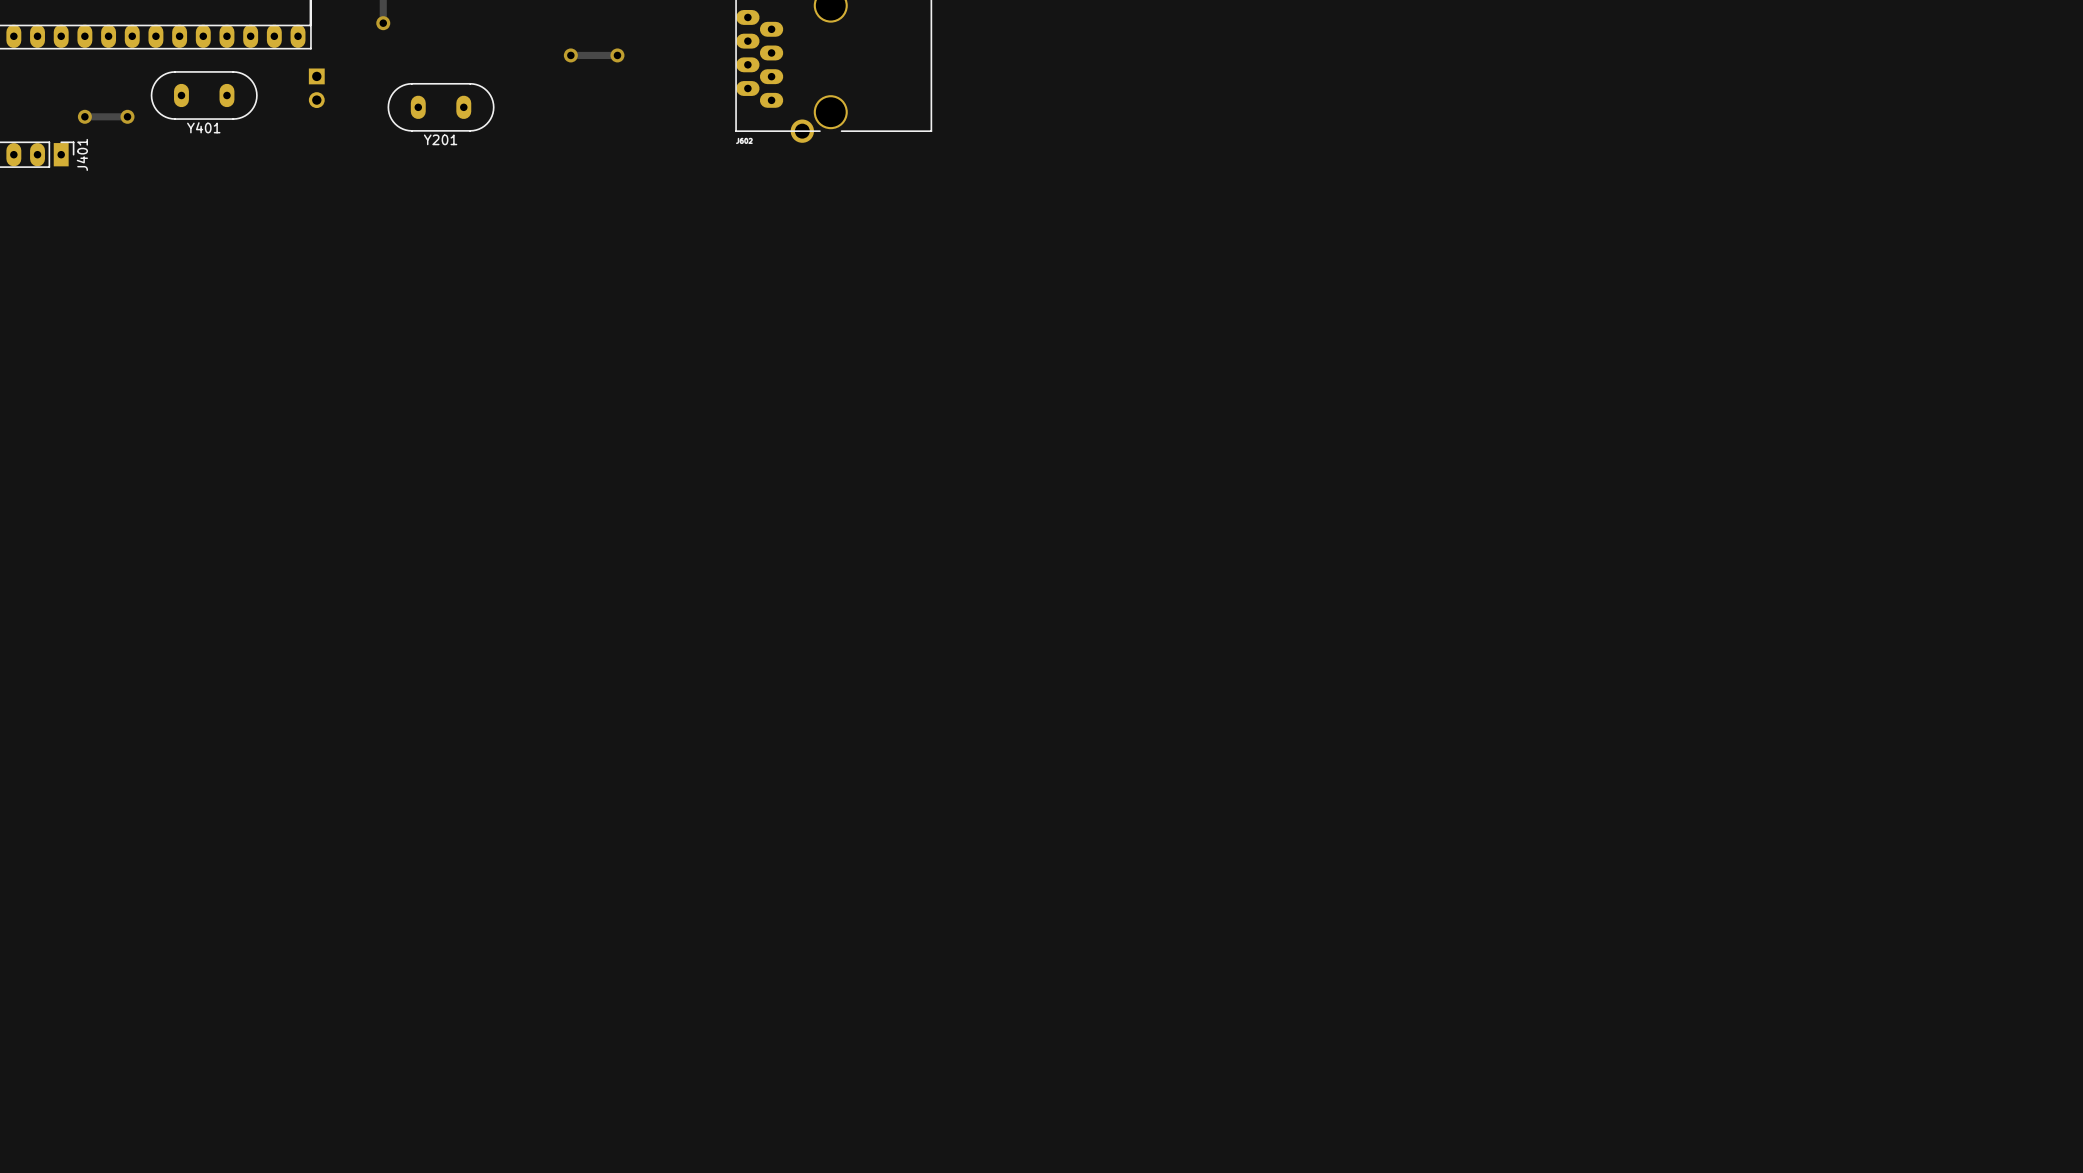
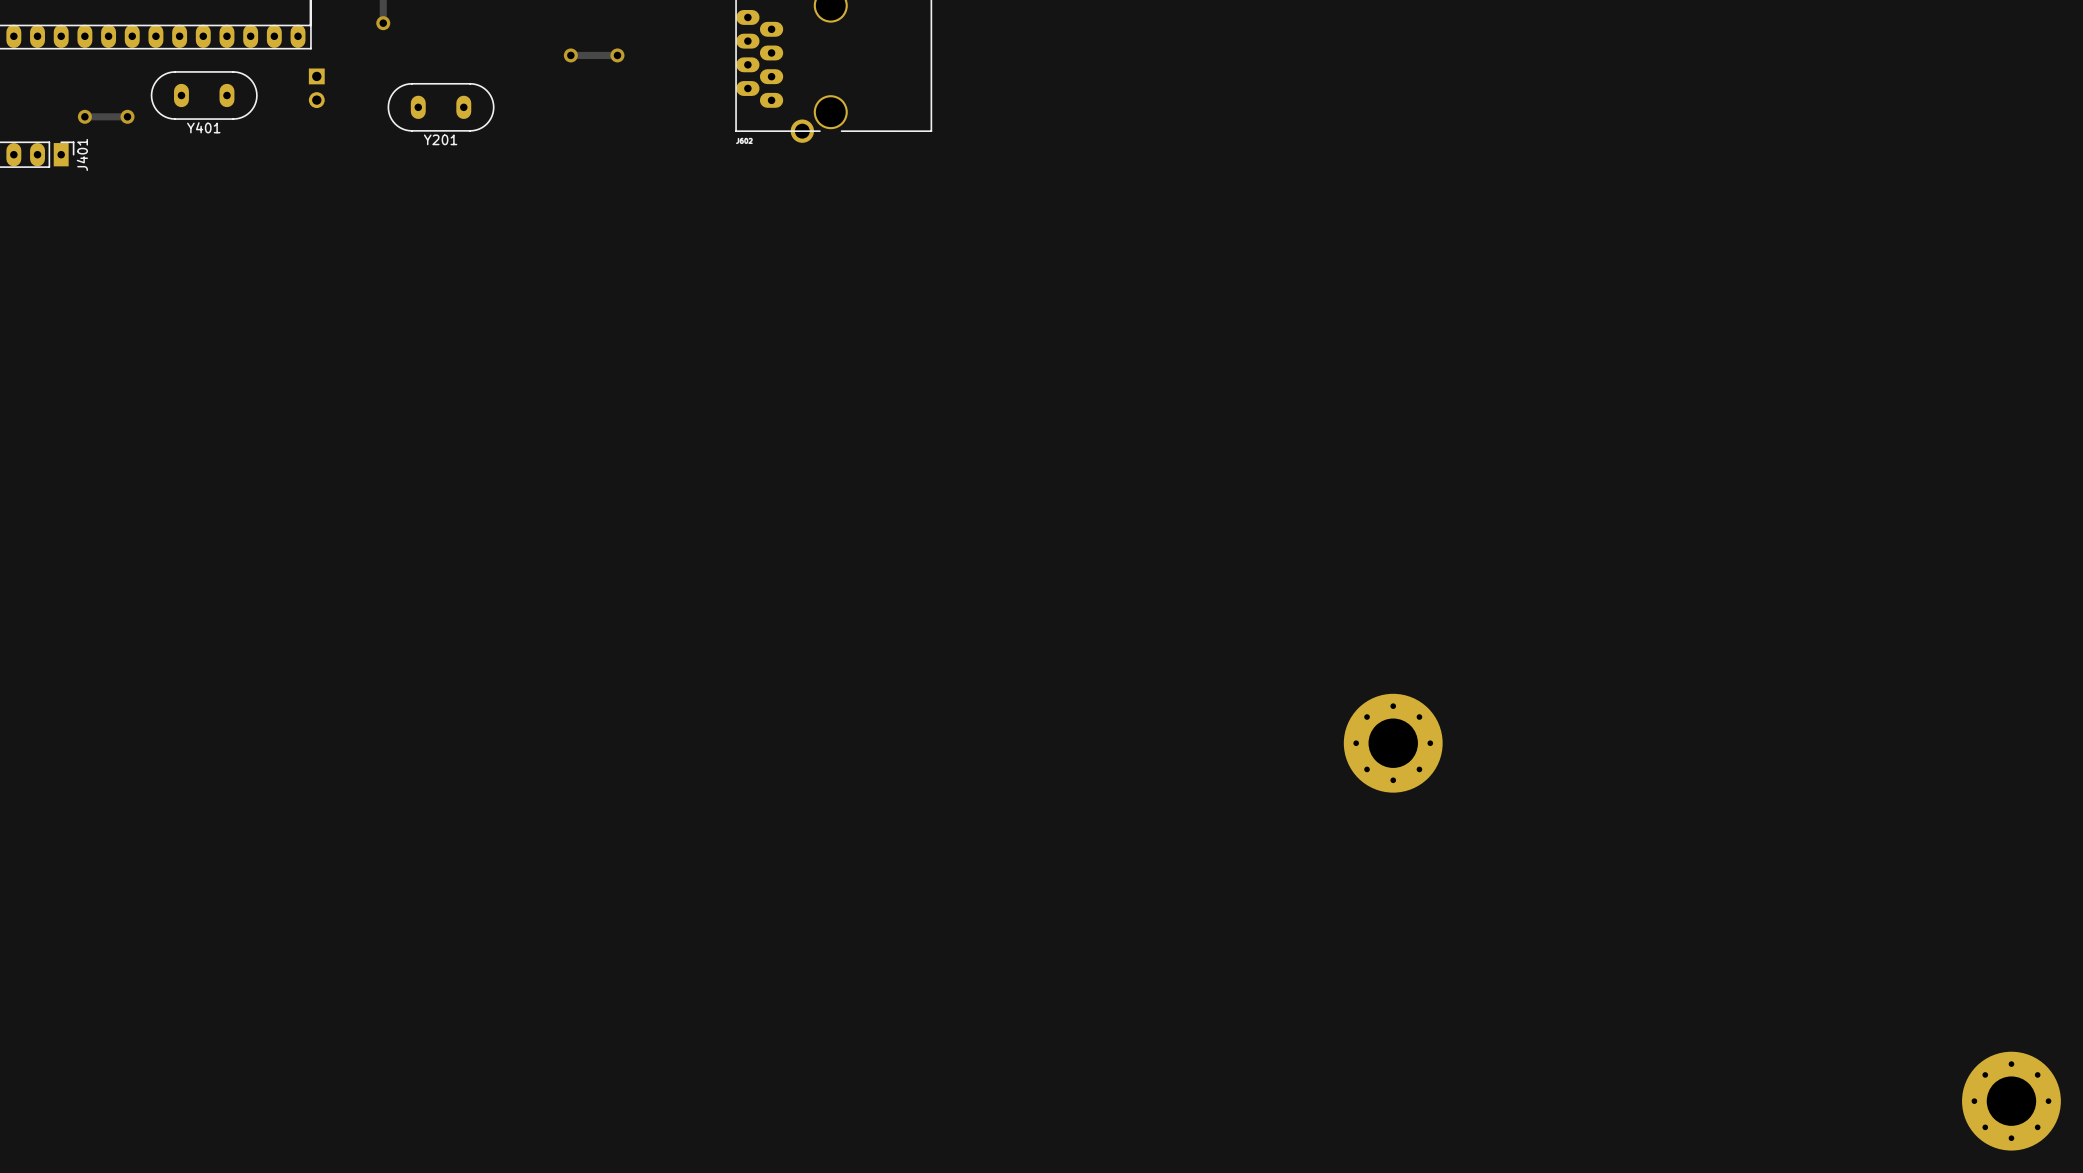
part: none -> (1393, 743)
part: none -> (2011, 1101)

